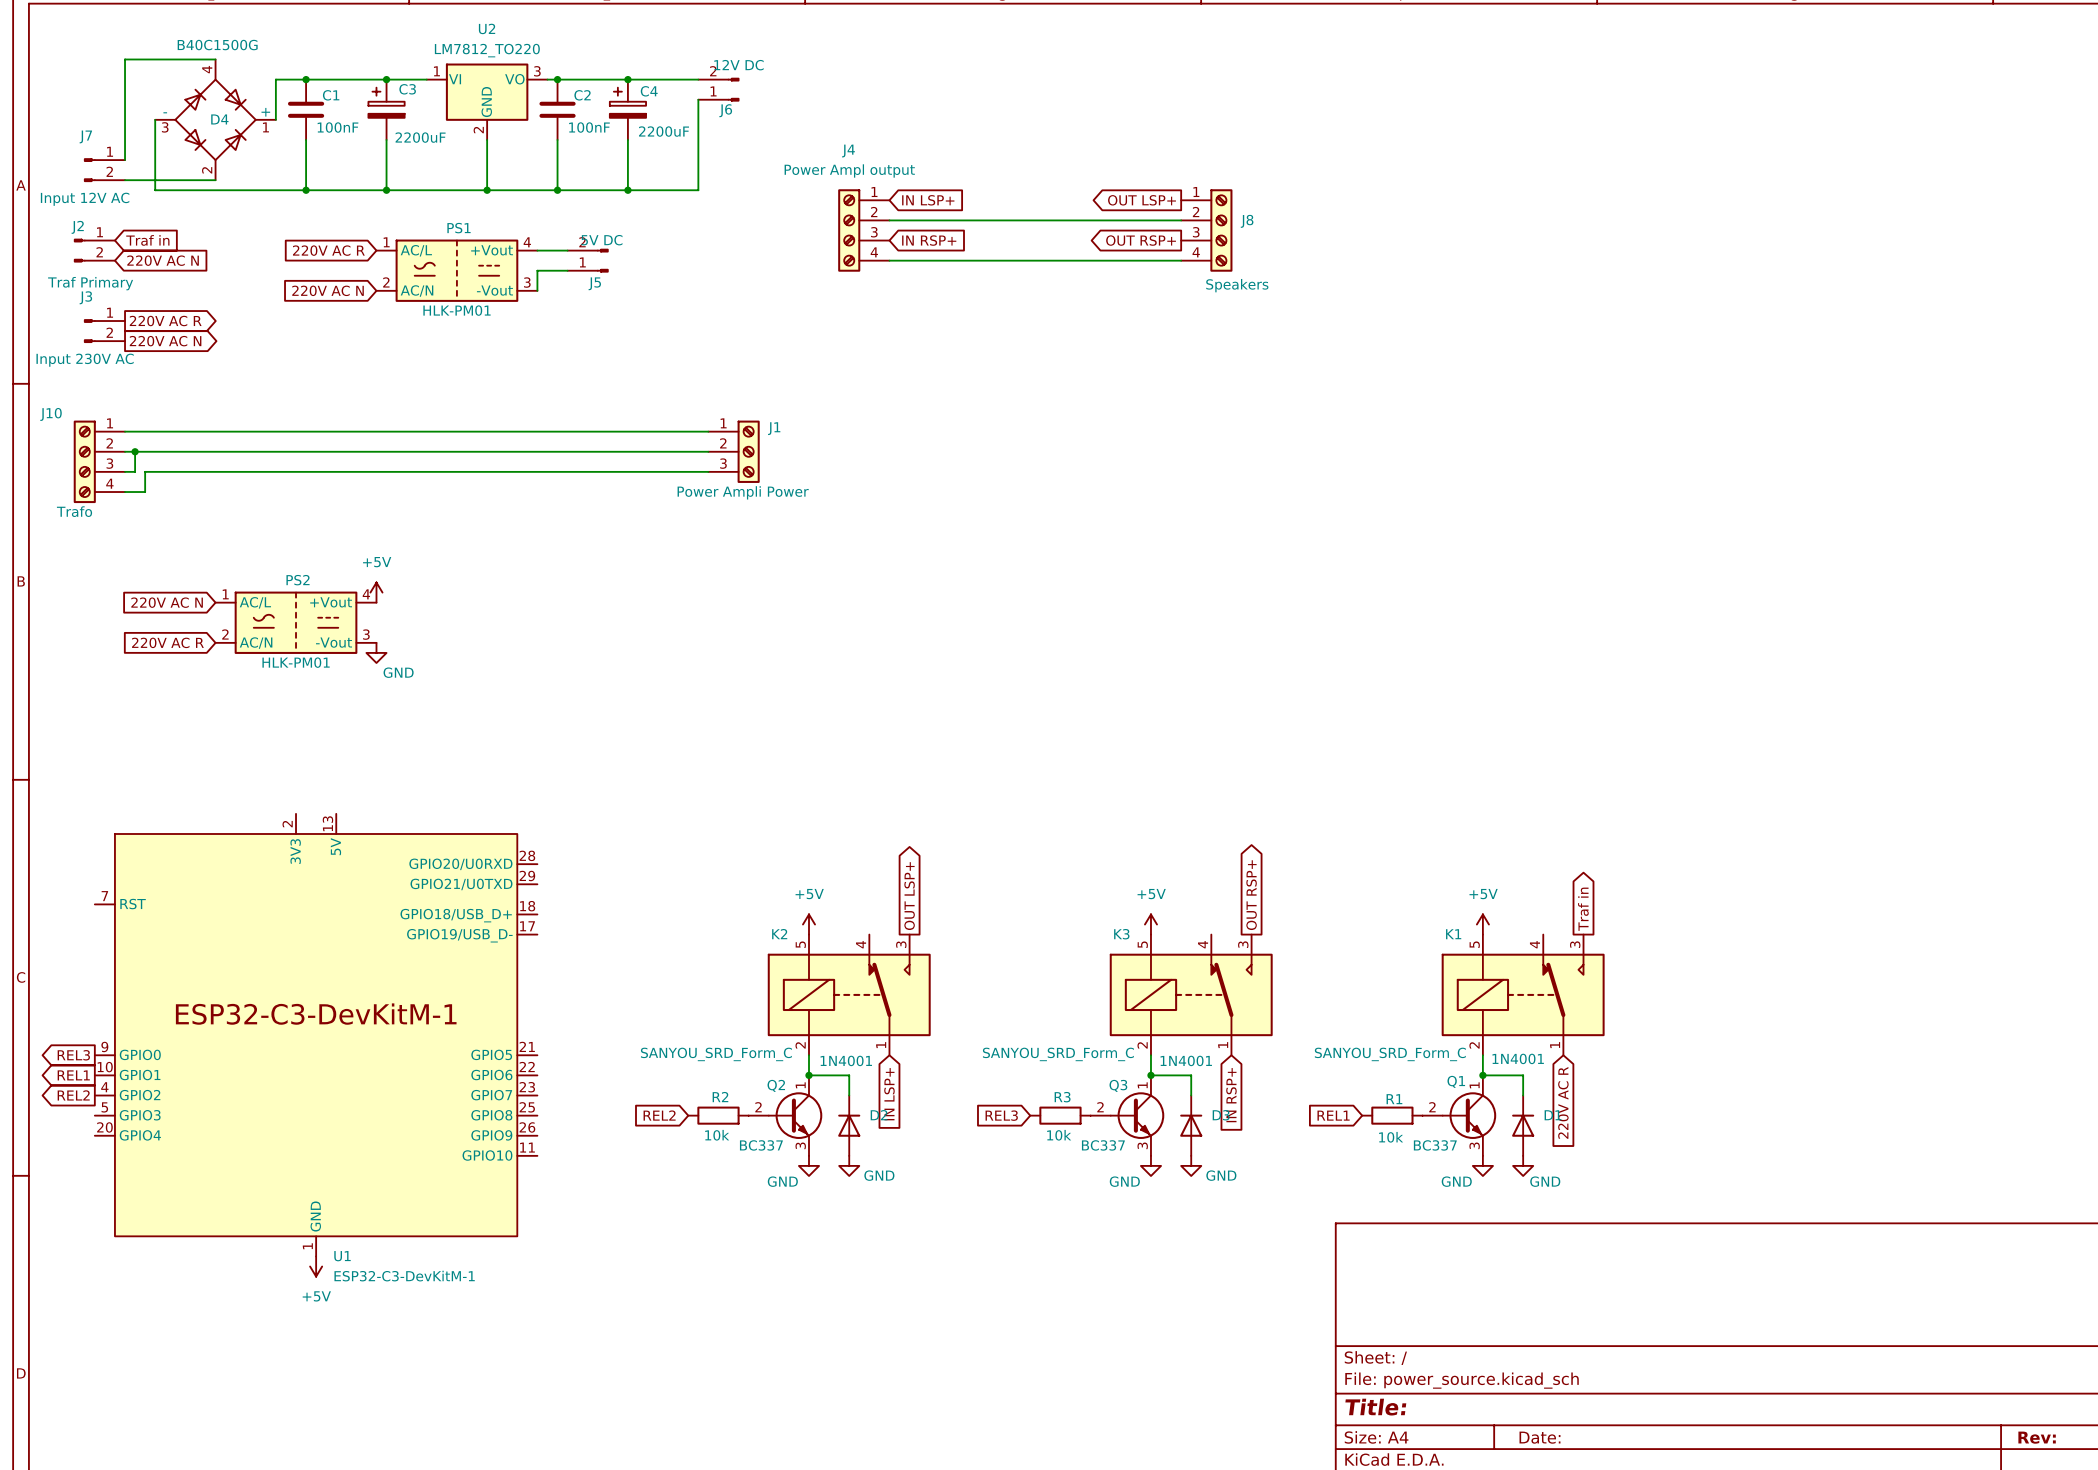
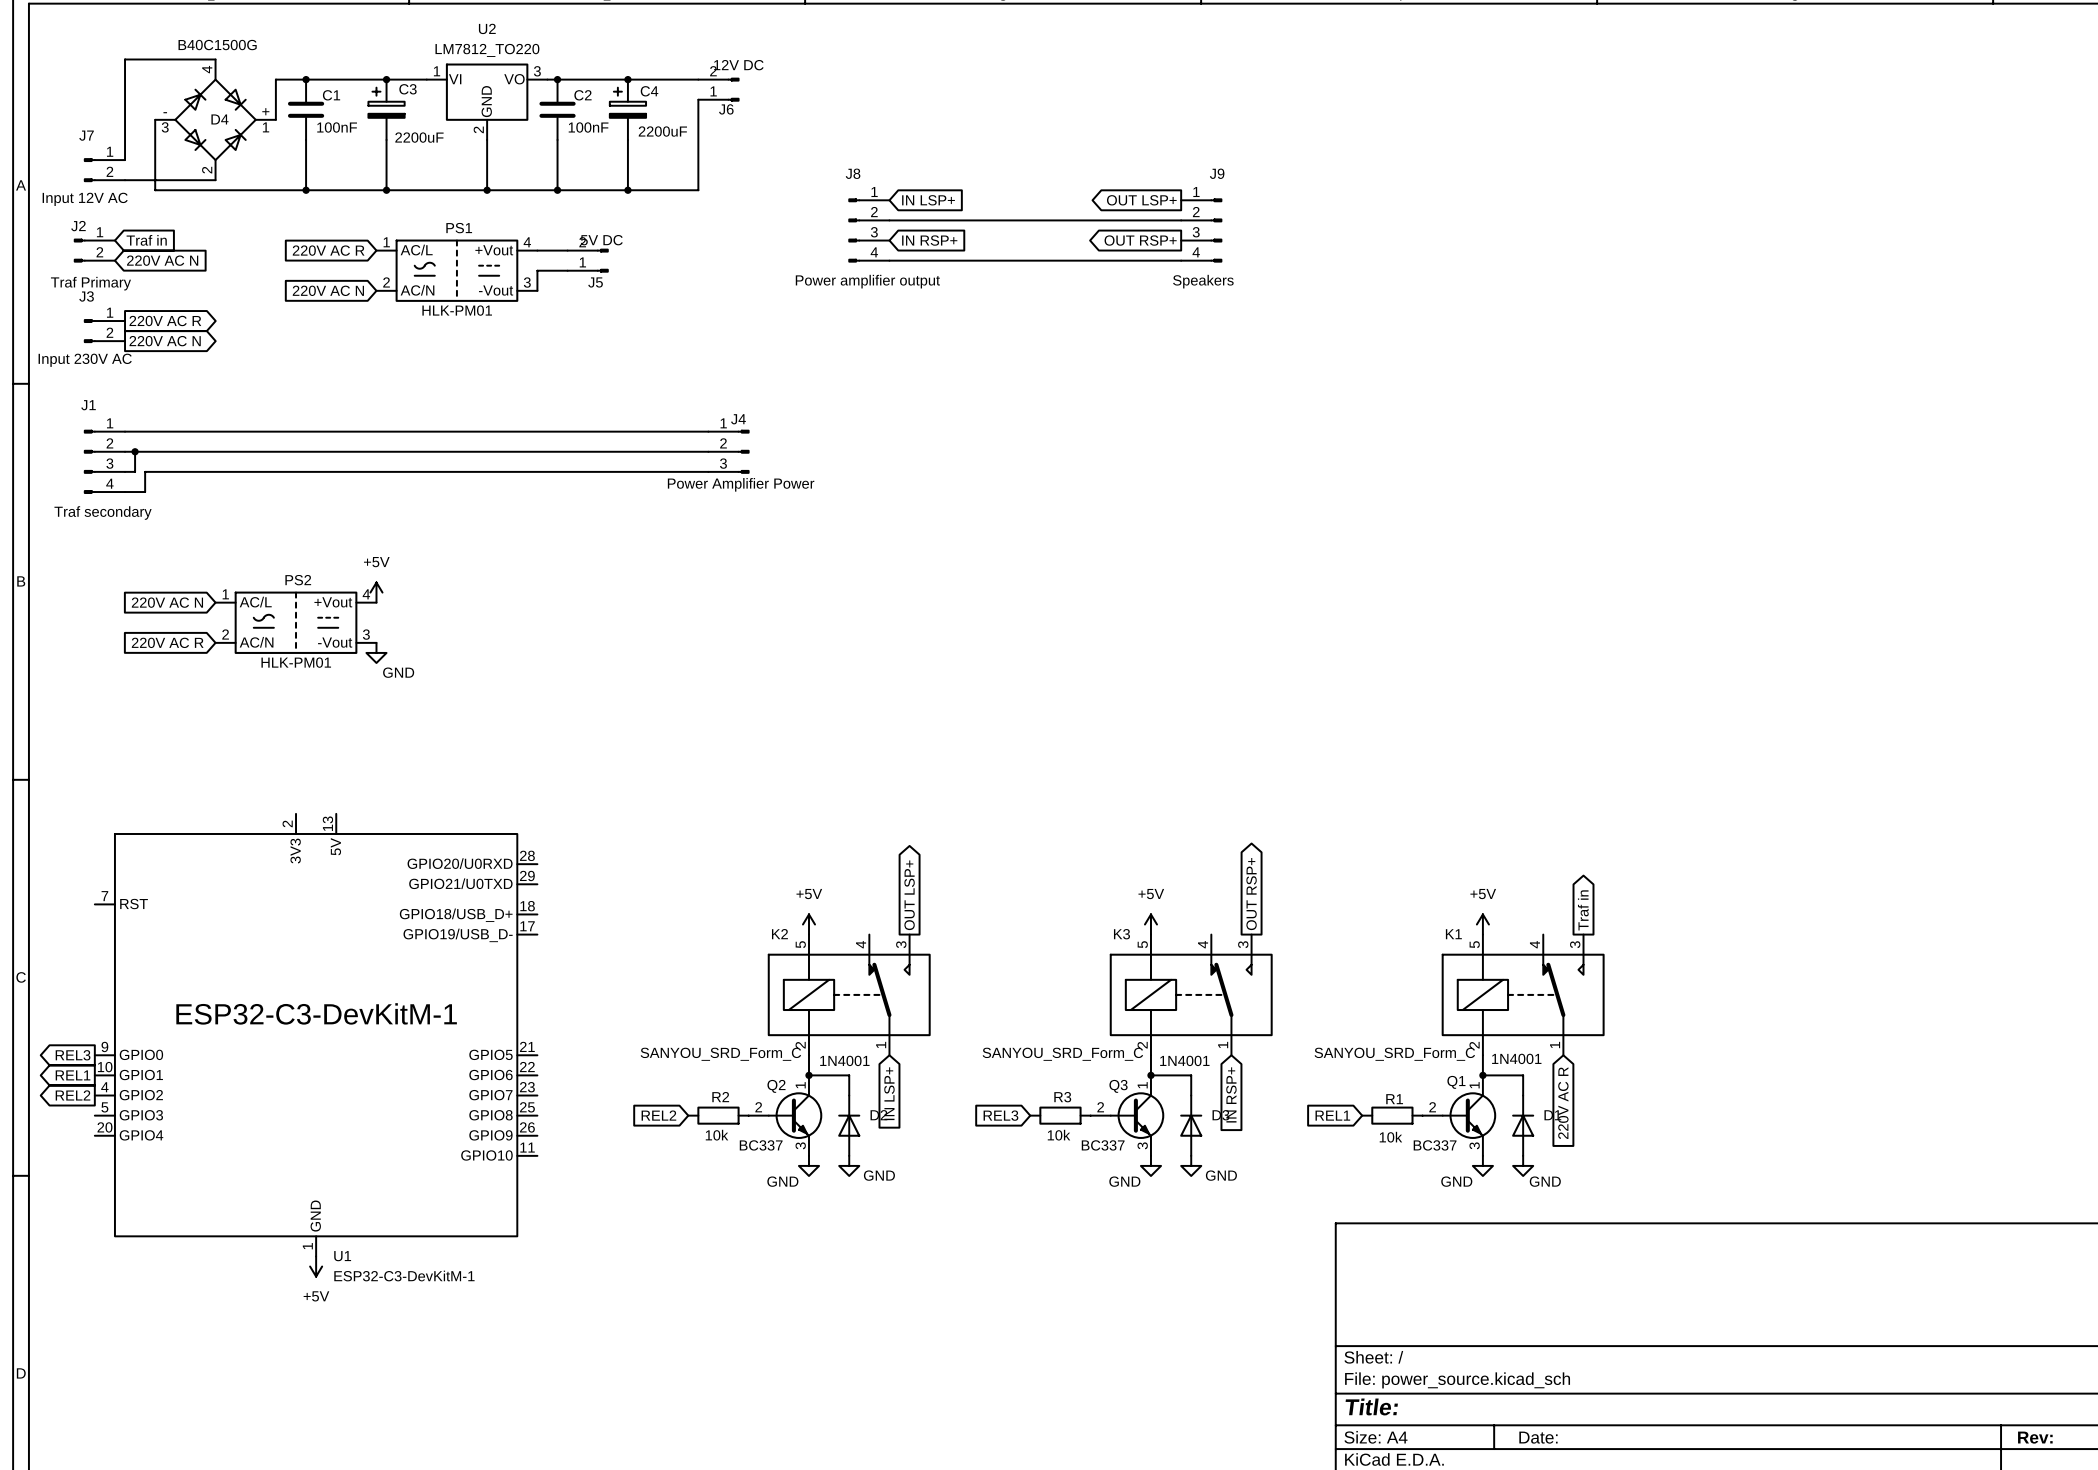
J4 name position: J4 (848, 151) -> J4 (738, 419)
J4 value: Power Ampl output (849, 170) -> Power Amplifier Power (741, 484)
J4 symbol: [838, 189, 890, 272] -> [708, 430, 750, 474]
J8 symbol: [1181, 189, 1233, 272] -> [848, 198, 890, 263]
J8 name position: J8 (1247, 221) -> J8 (853, 173)
J9: none -> Speakers (1201, 230)
J8 value: Speakers (1237, 285) -> Power amplifier output (867, 281)
J1 symbol: [708, 420, 760, 483] -> [84, 430, 126, 494]
J1 name position: J1 (774, 428) -> J1 (88, 405)
J10: Trafo (99, 461) -> none
J1 value: Power Ampli Power (743, 492) -> Traf secondary (103, 512)

